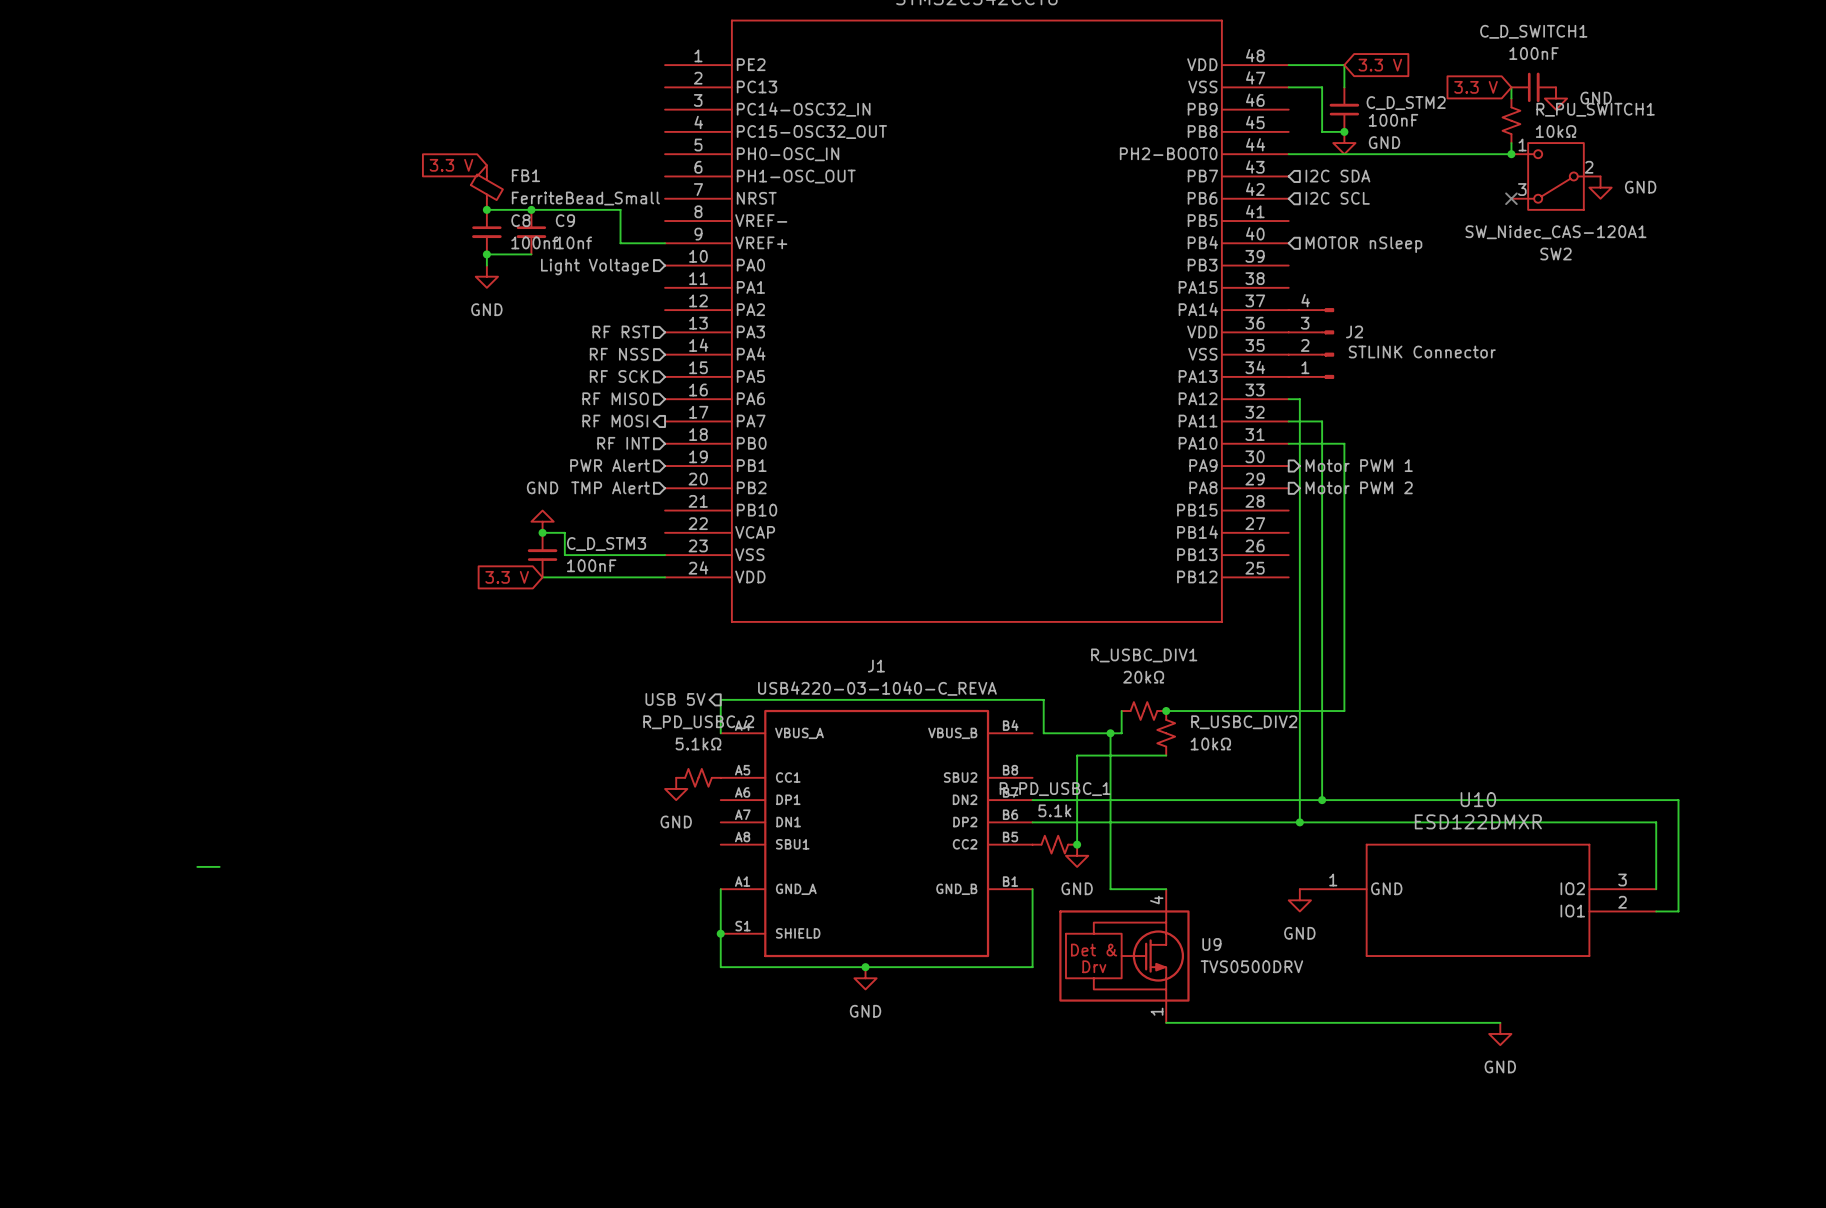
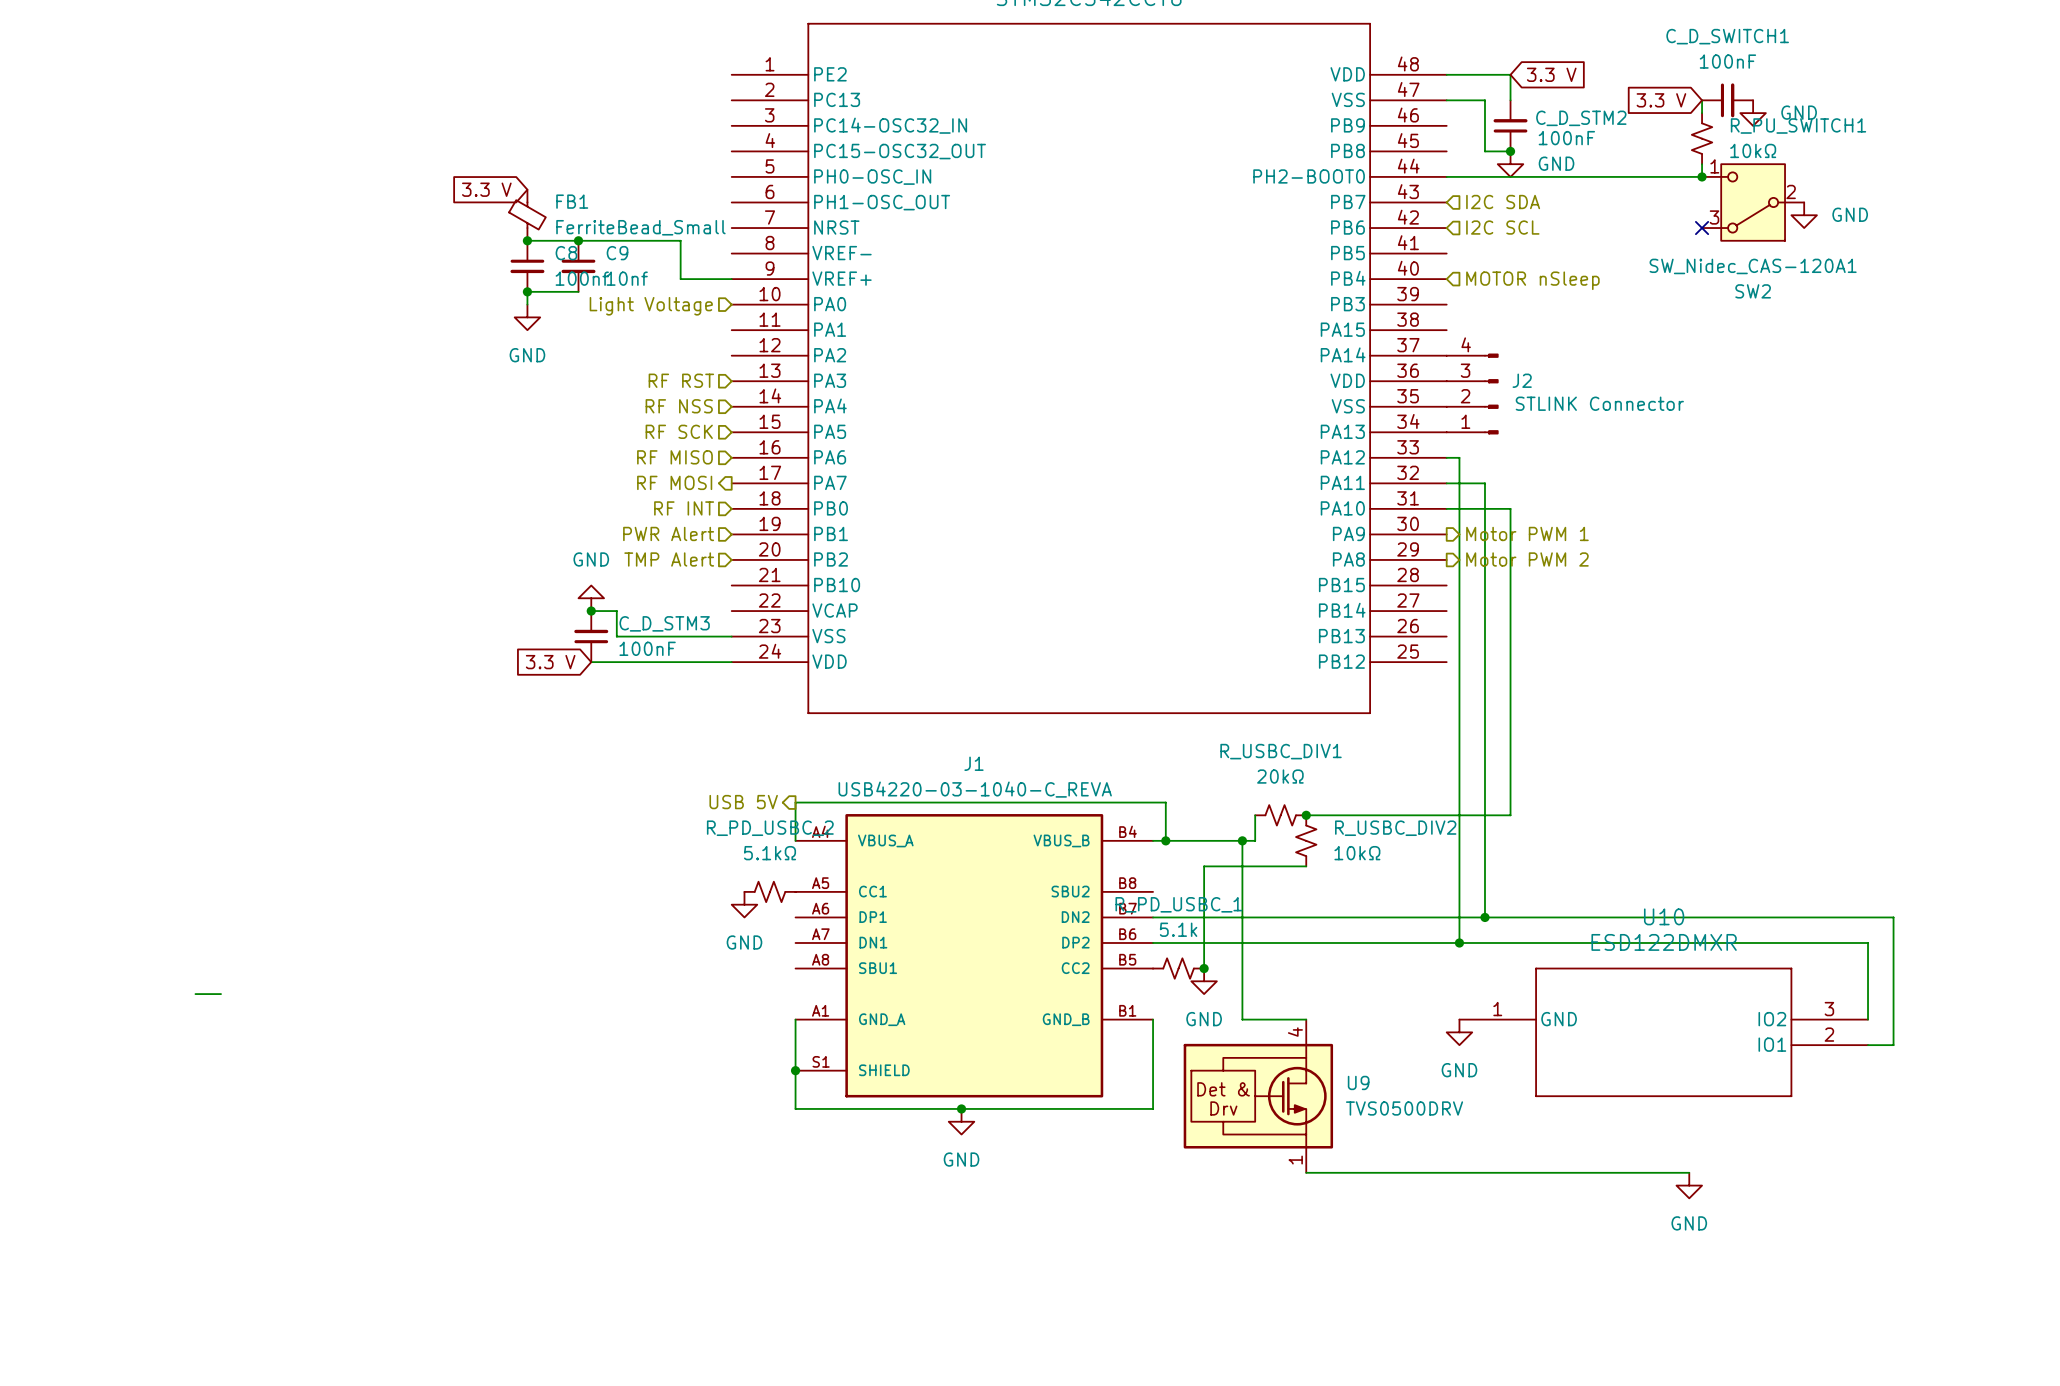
wire: none -> (1153, 840) (1165, 840)
junction: none -> (1165, 840)

